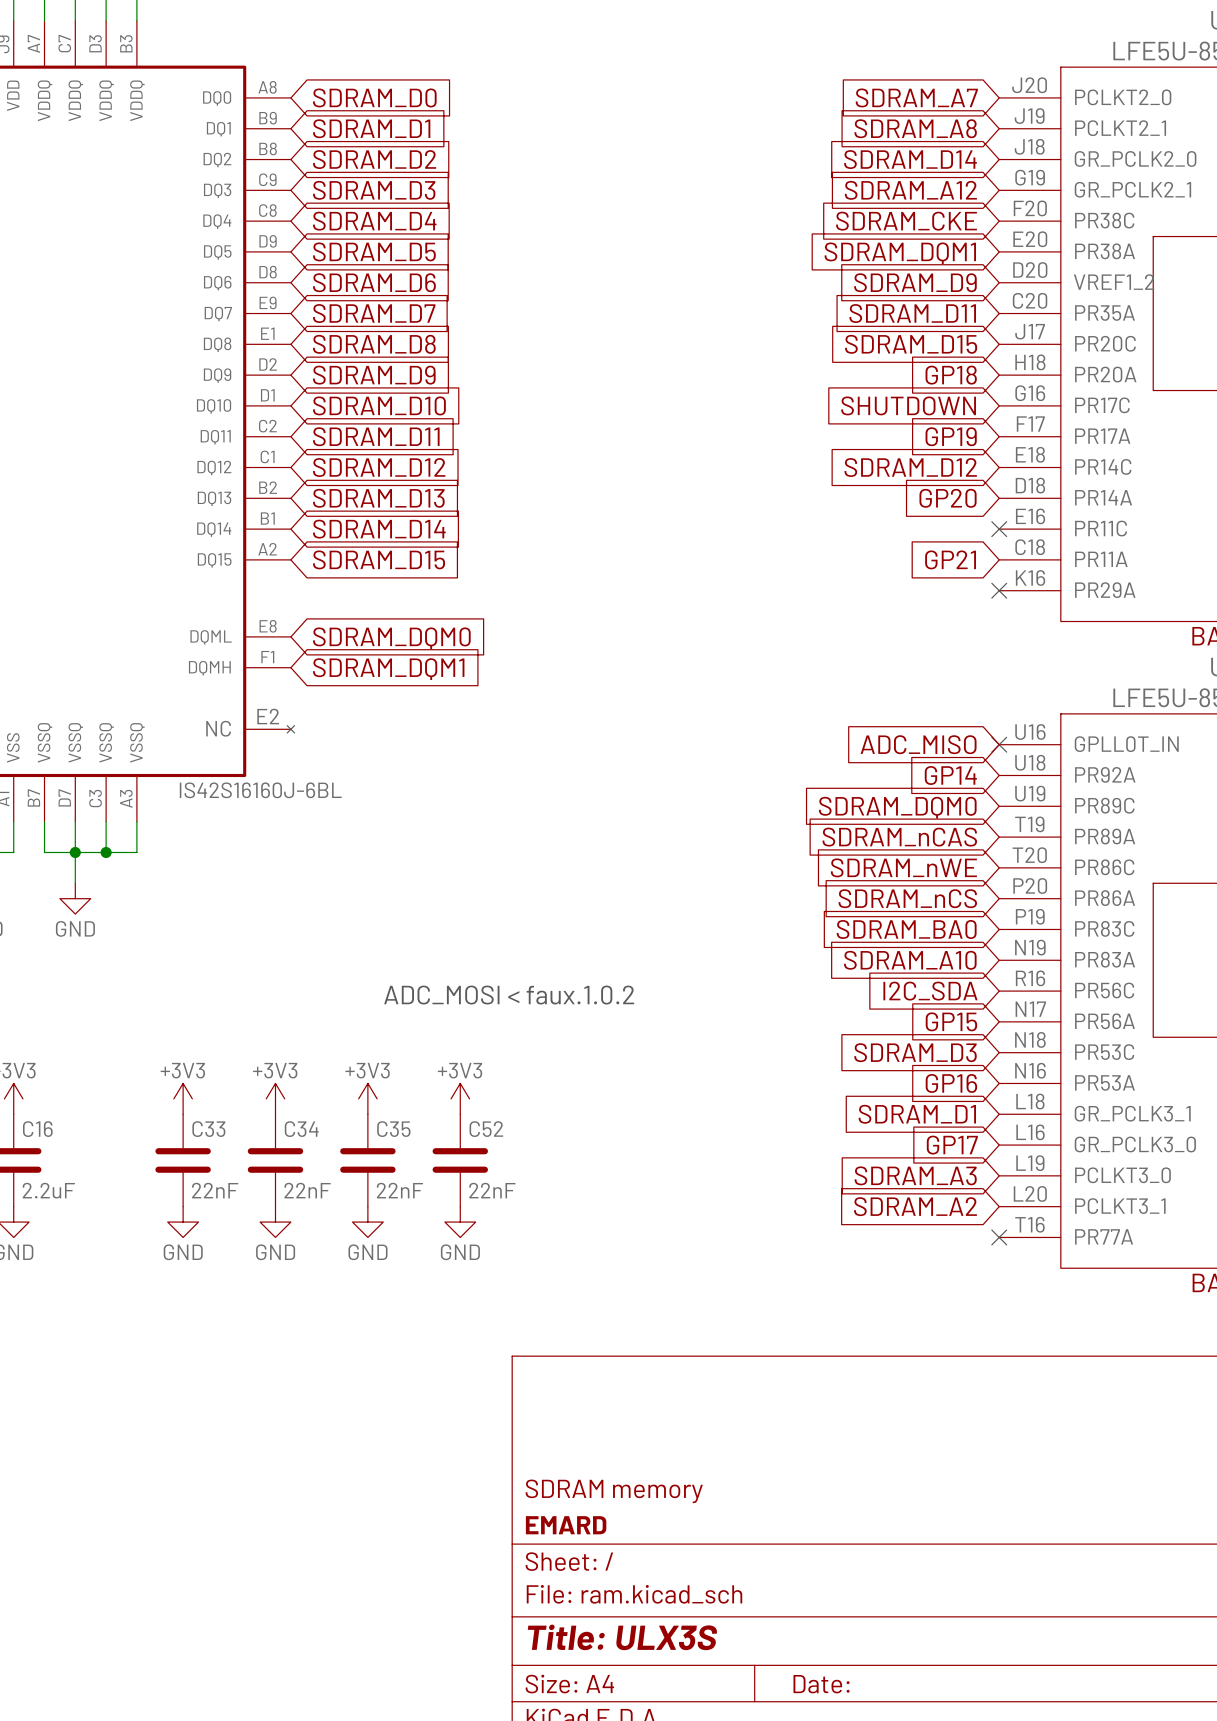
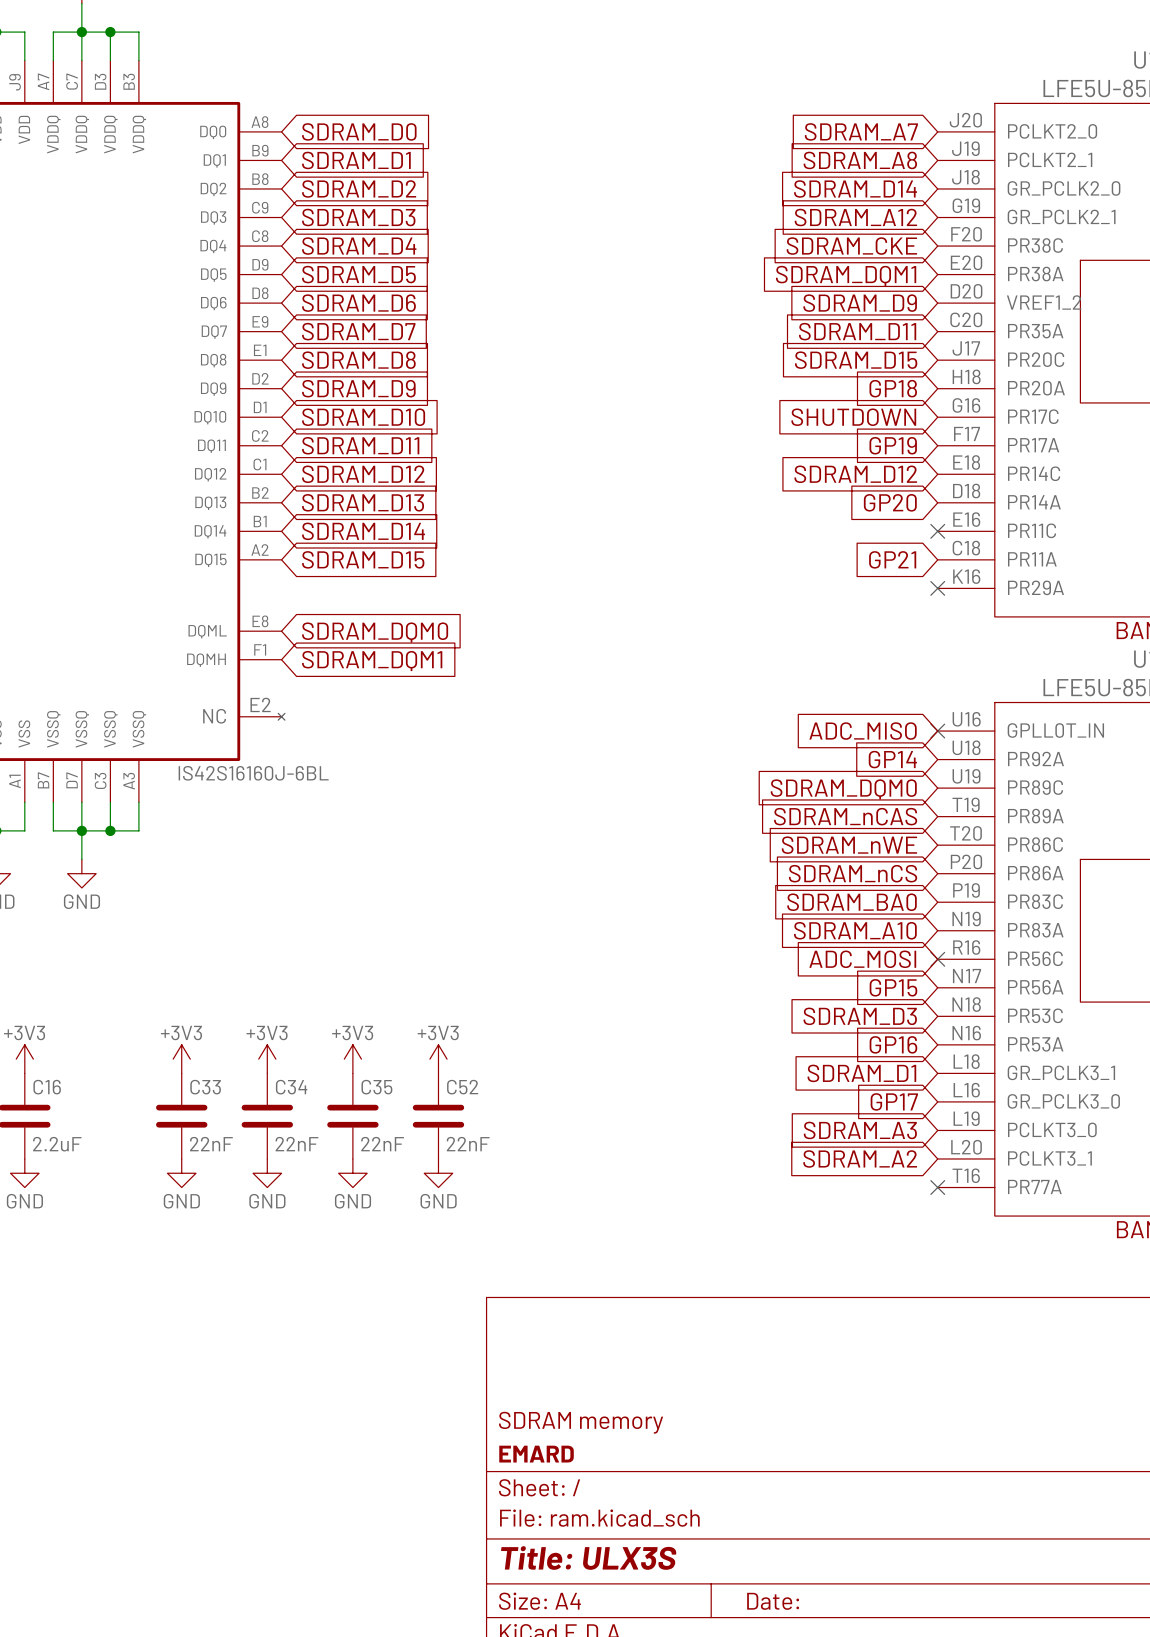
global label: I2C_SDA (930, 991) -> ADC_MOSI (862, 959)
no-connect mark: none -> (937, 959)
text: ADC_MOSI < faux.1.0.2 (509, 995) -> none

